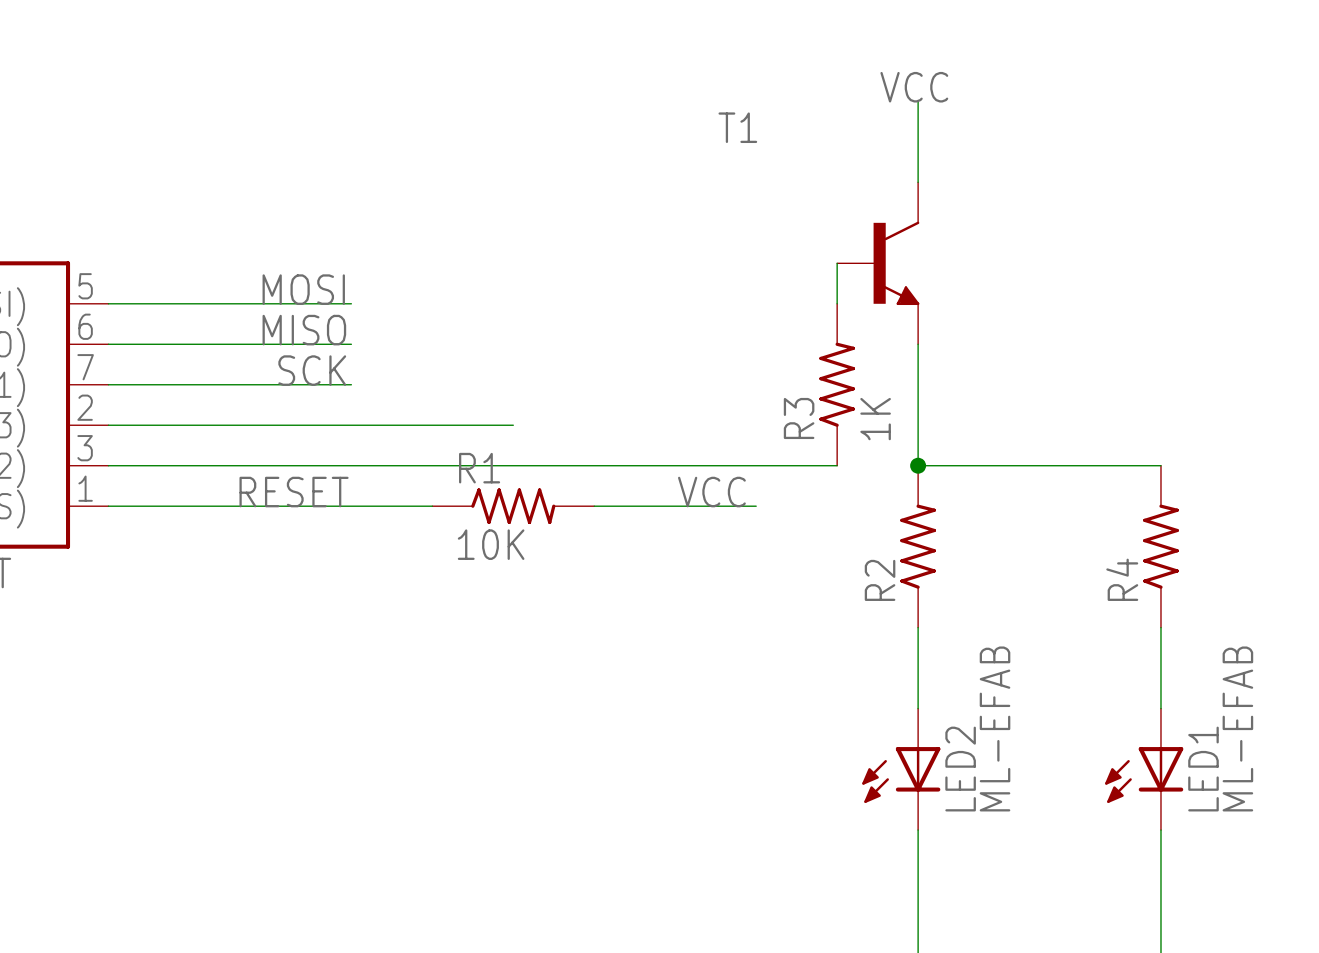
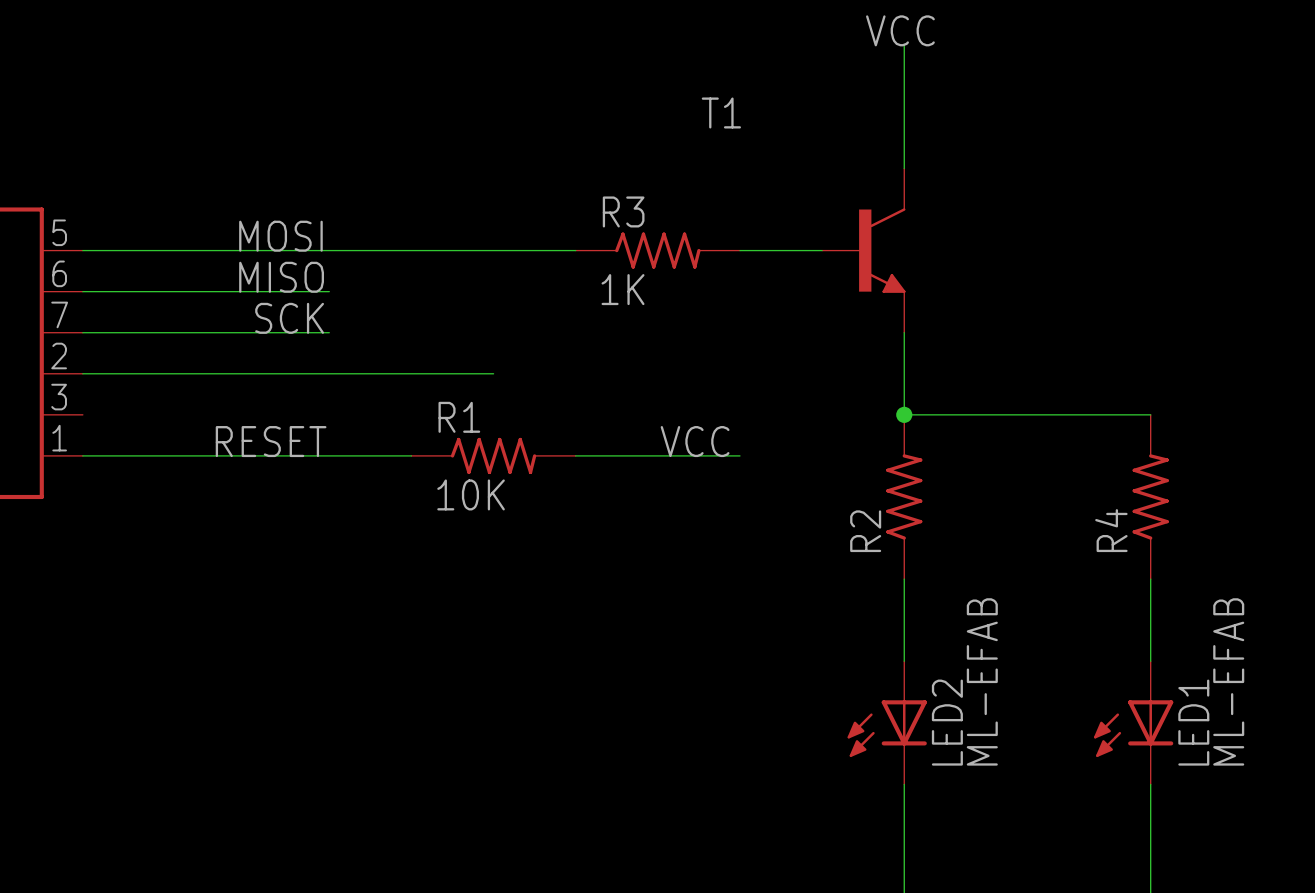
wire: (837, 263) (837, 303) -> (739, 250) (822, 250)
T1 position: (878, 263) -> (863, 250)
wire: none -> (329, 250) (575, 250)
R3 rotation: 0° (837, 384) -> 90° clockwise (657, 250)
R3 position: (837, 384) -> (657, 250)
wire: (108, 465) (837, 465) -> none

